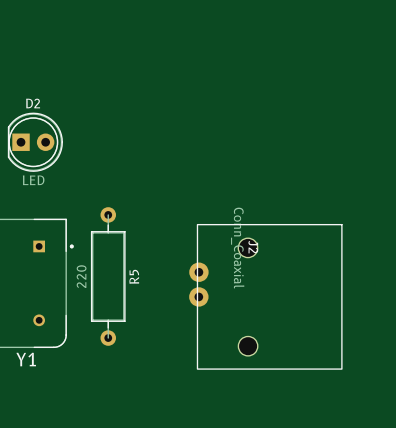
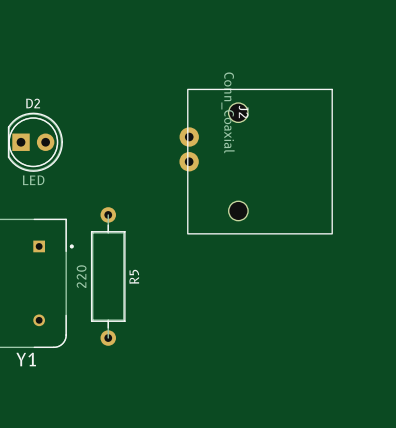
J2 position: (265, 296) -> (256, 161)

